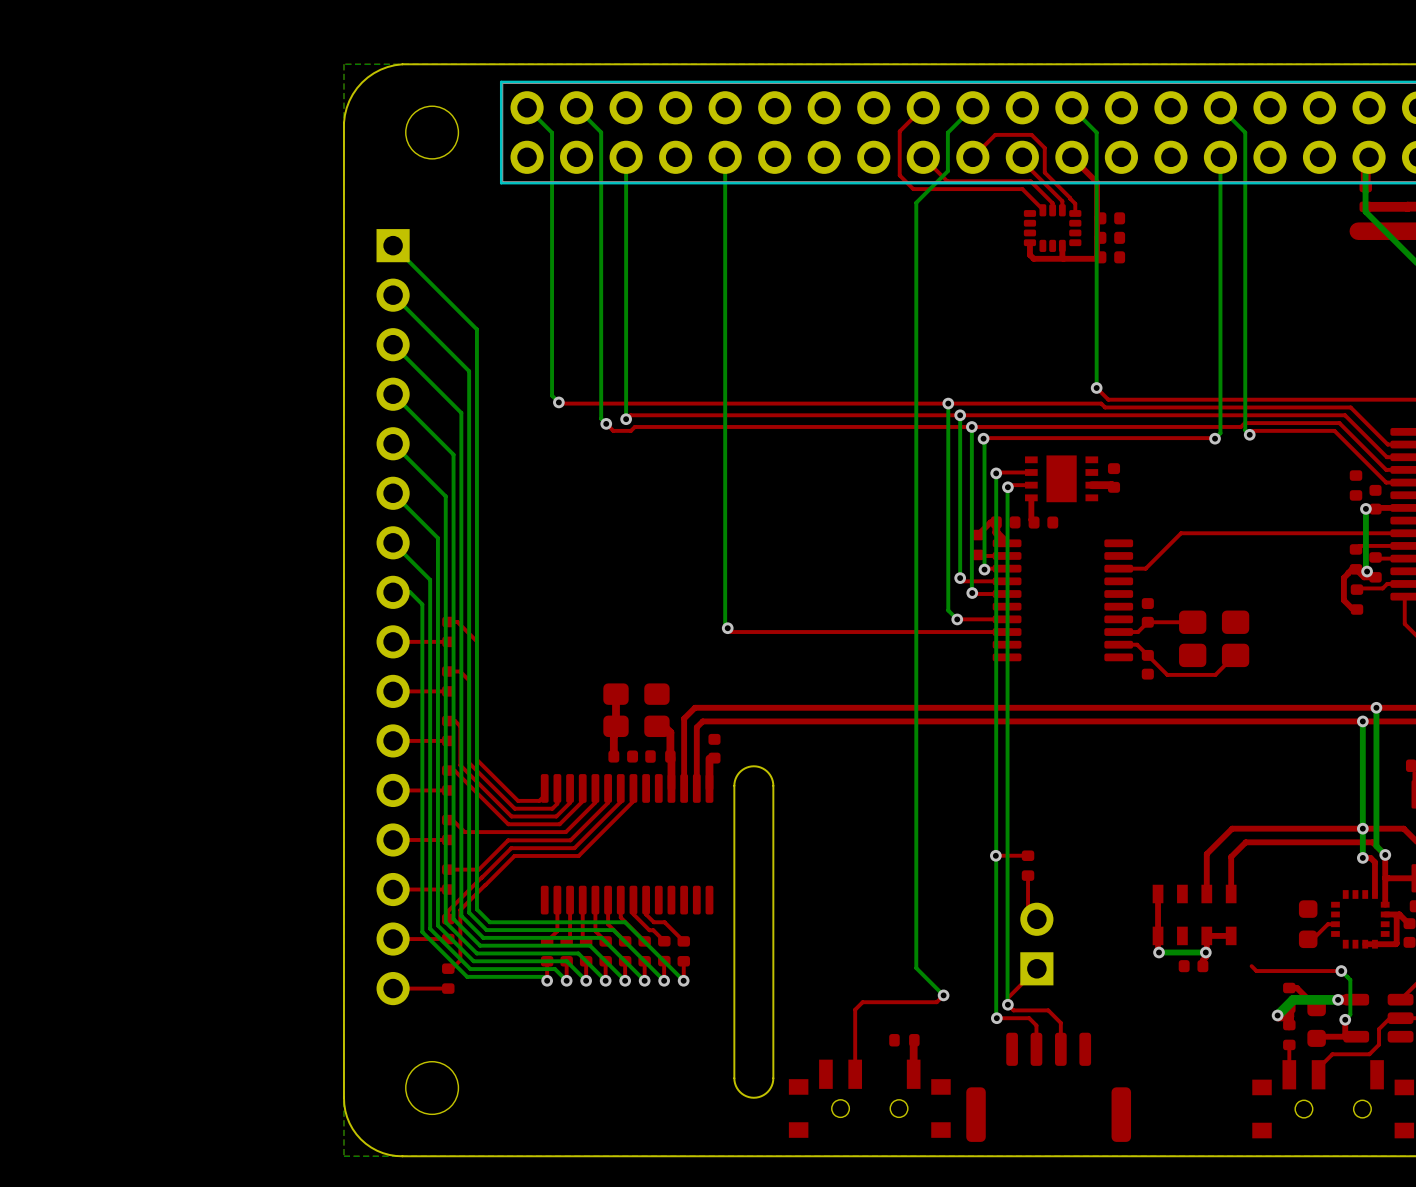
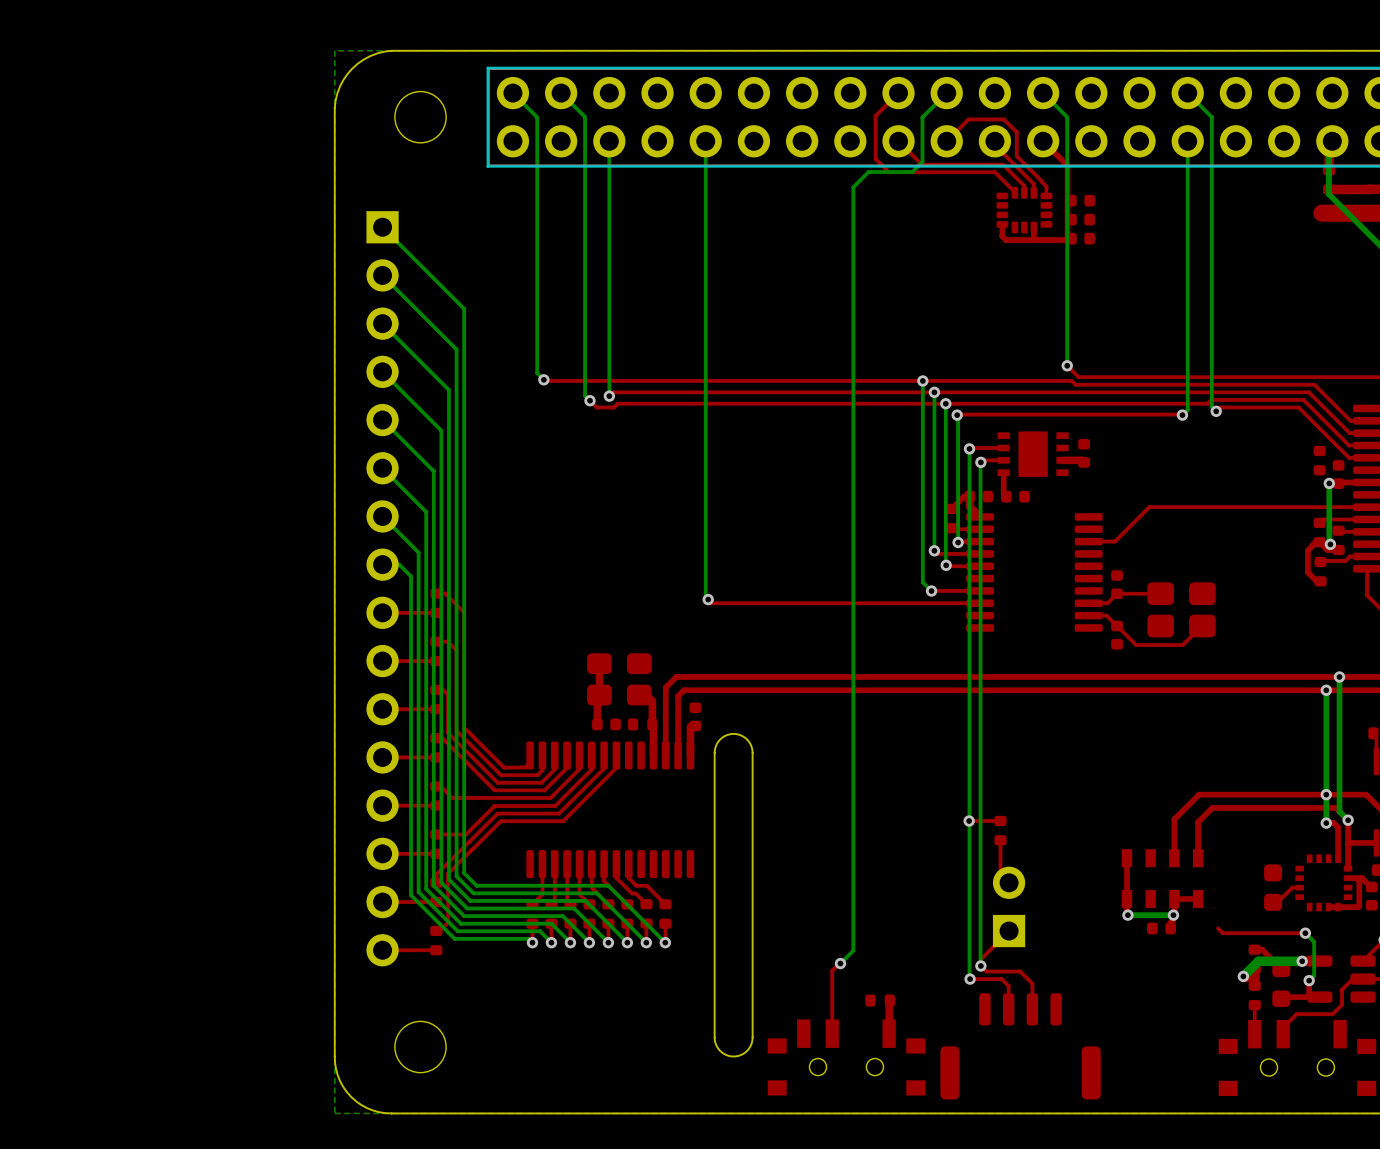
bottom track: (947, 171) (916, 202) (916, 968) (943, 995) -> (922, 154) (922, 161) (912, 172) (868, 172) (853, 187) (853, 950) (840, 963)
top track: (943, 995) (936, 1002) (863, 1002) -> none
via position: (943, 995) -> (840, 963)

